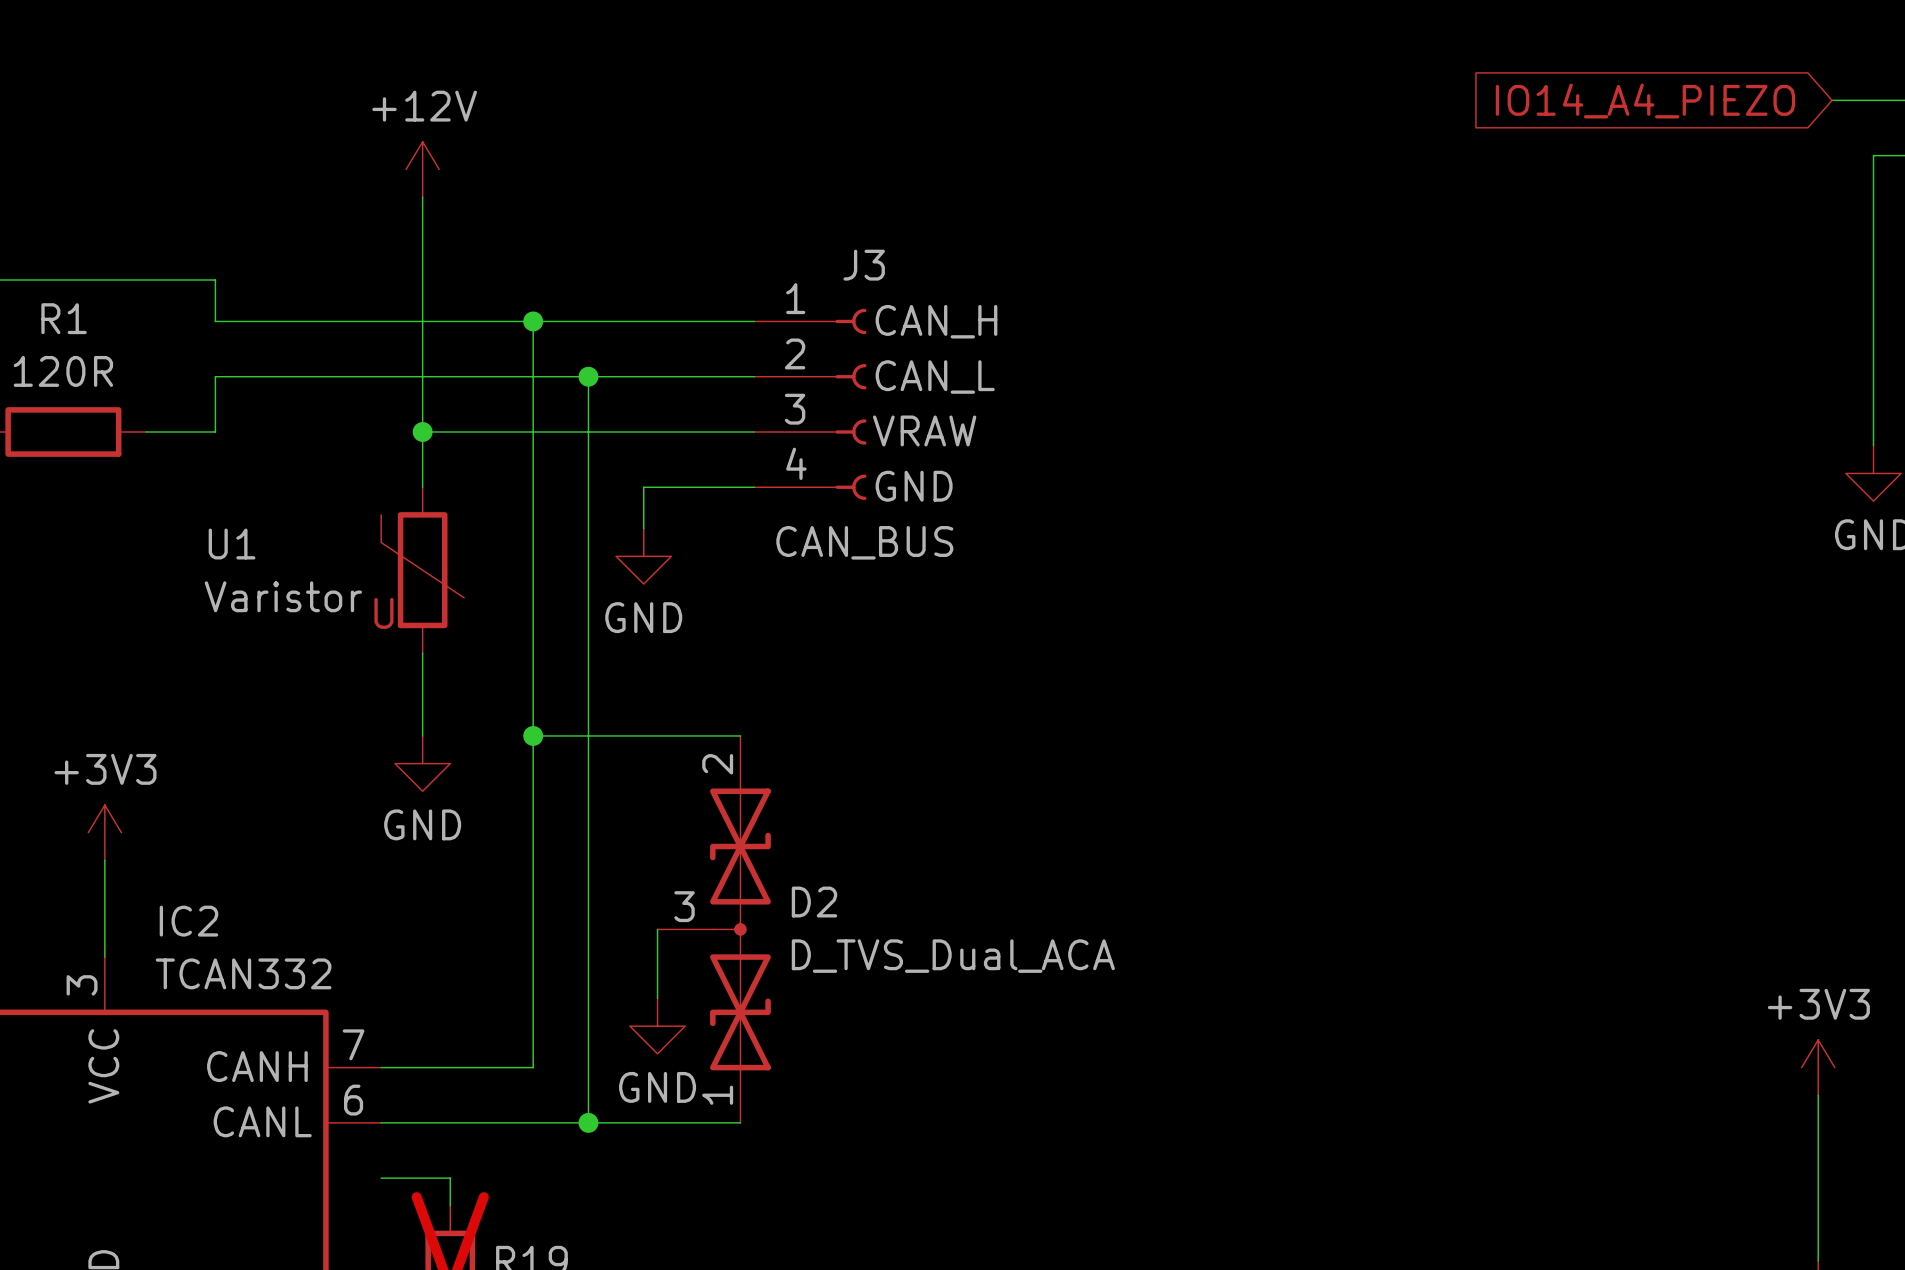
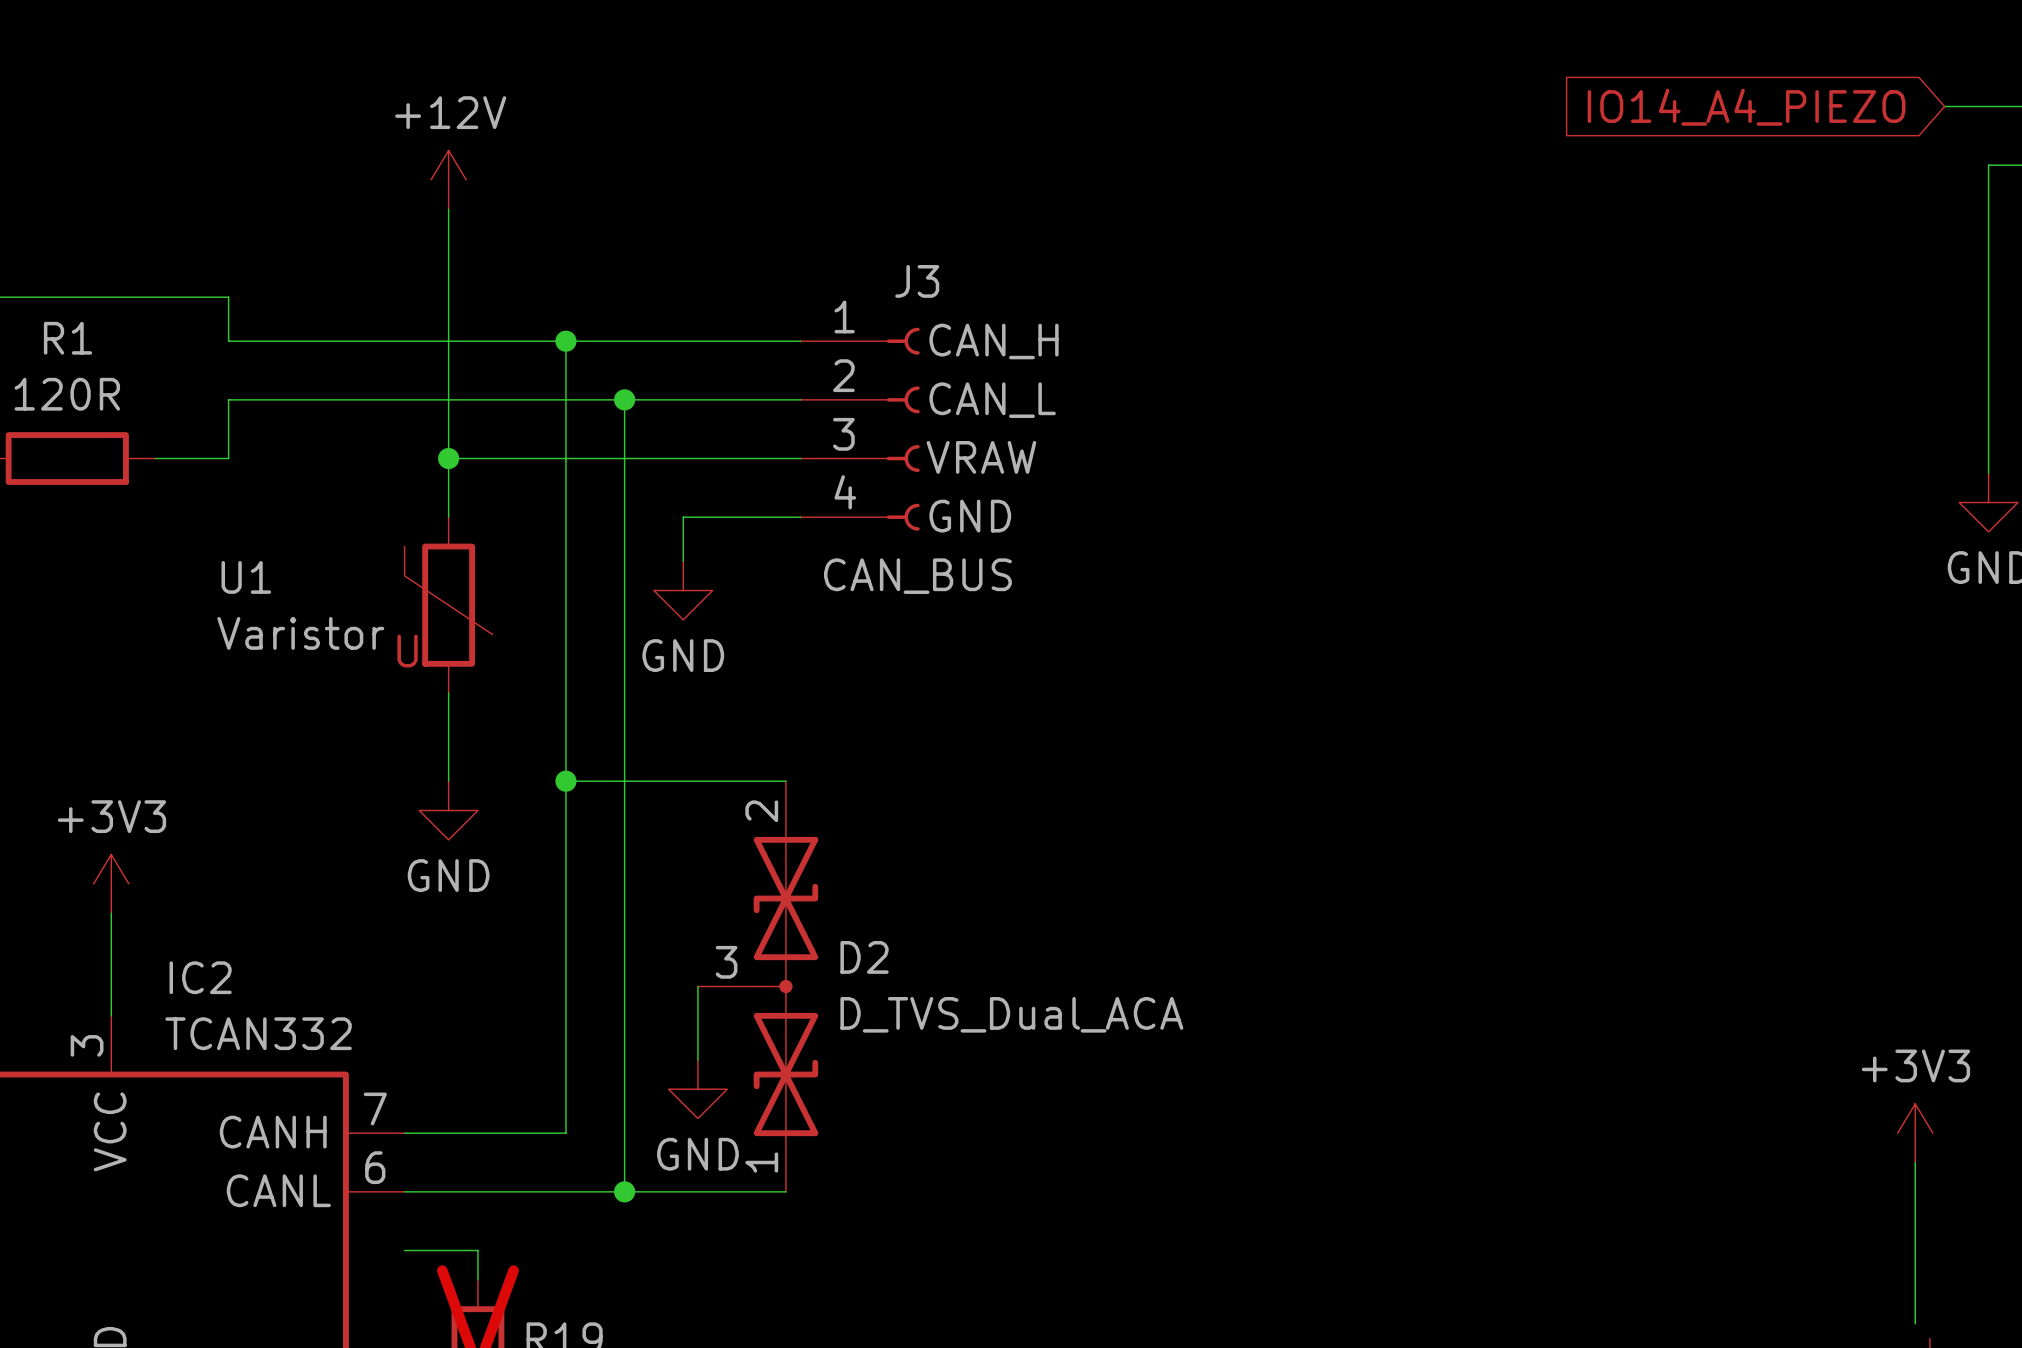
power symbol position: +3V3 (1818, 1067) -> +3V3 (1915, 1133)
wire: none -> (1915, 1162) (1915, 1323)
wire: (1818, 1095) (1818, 1261) -> none

